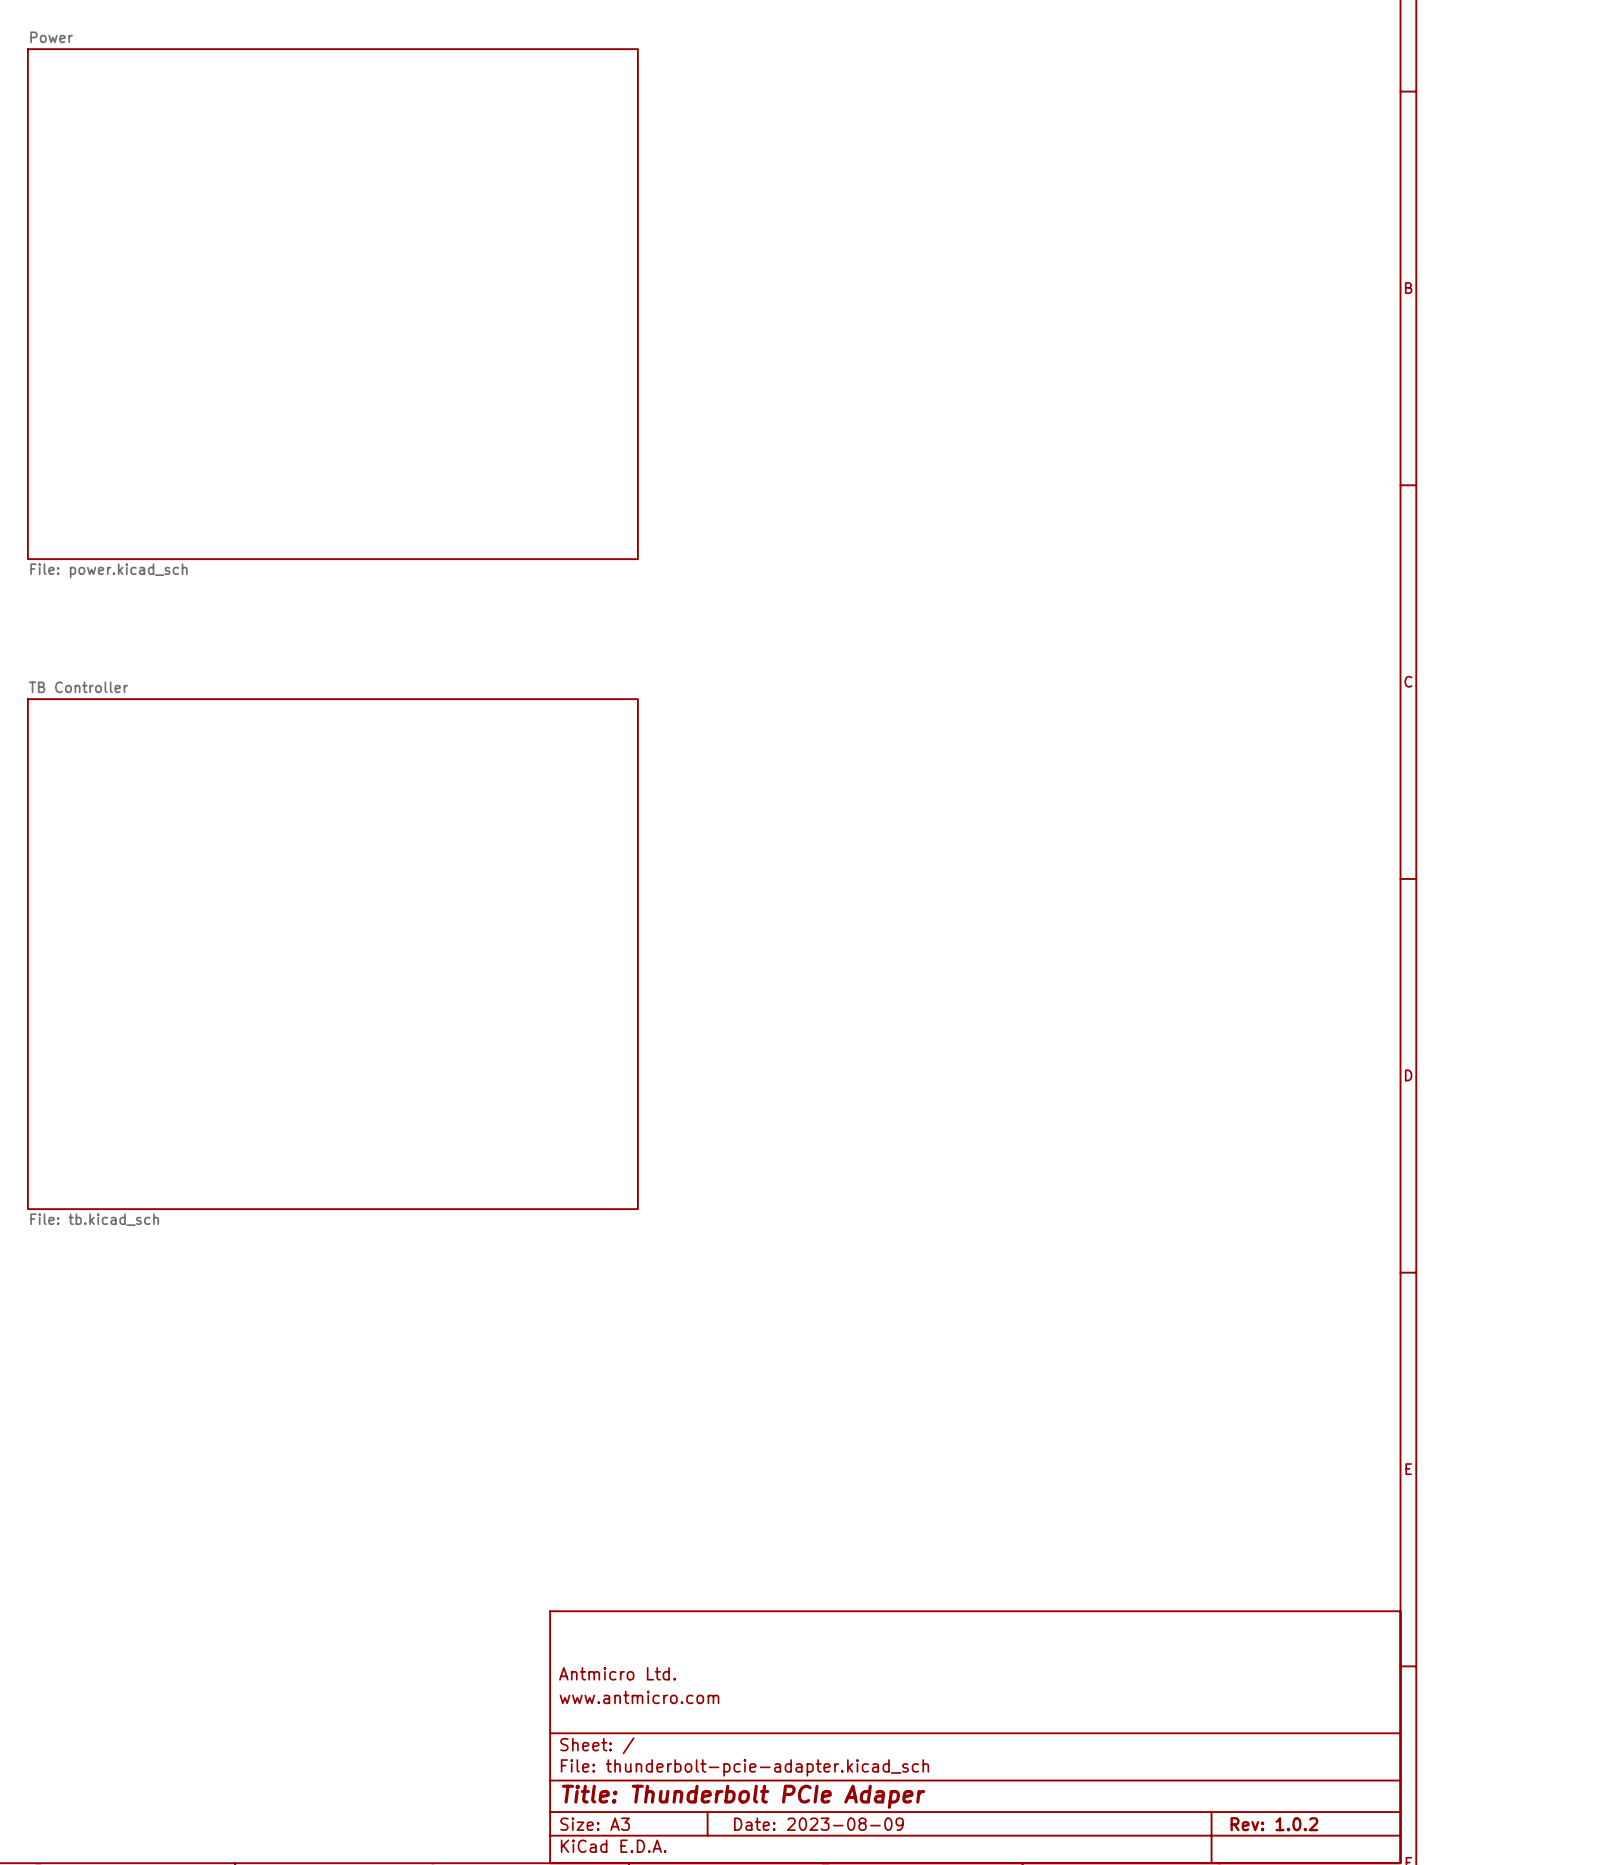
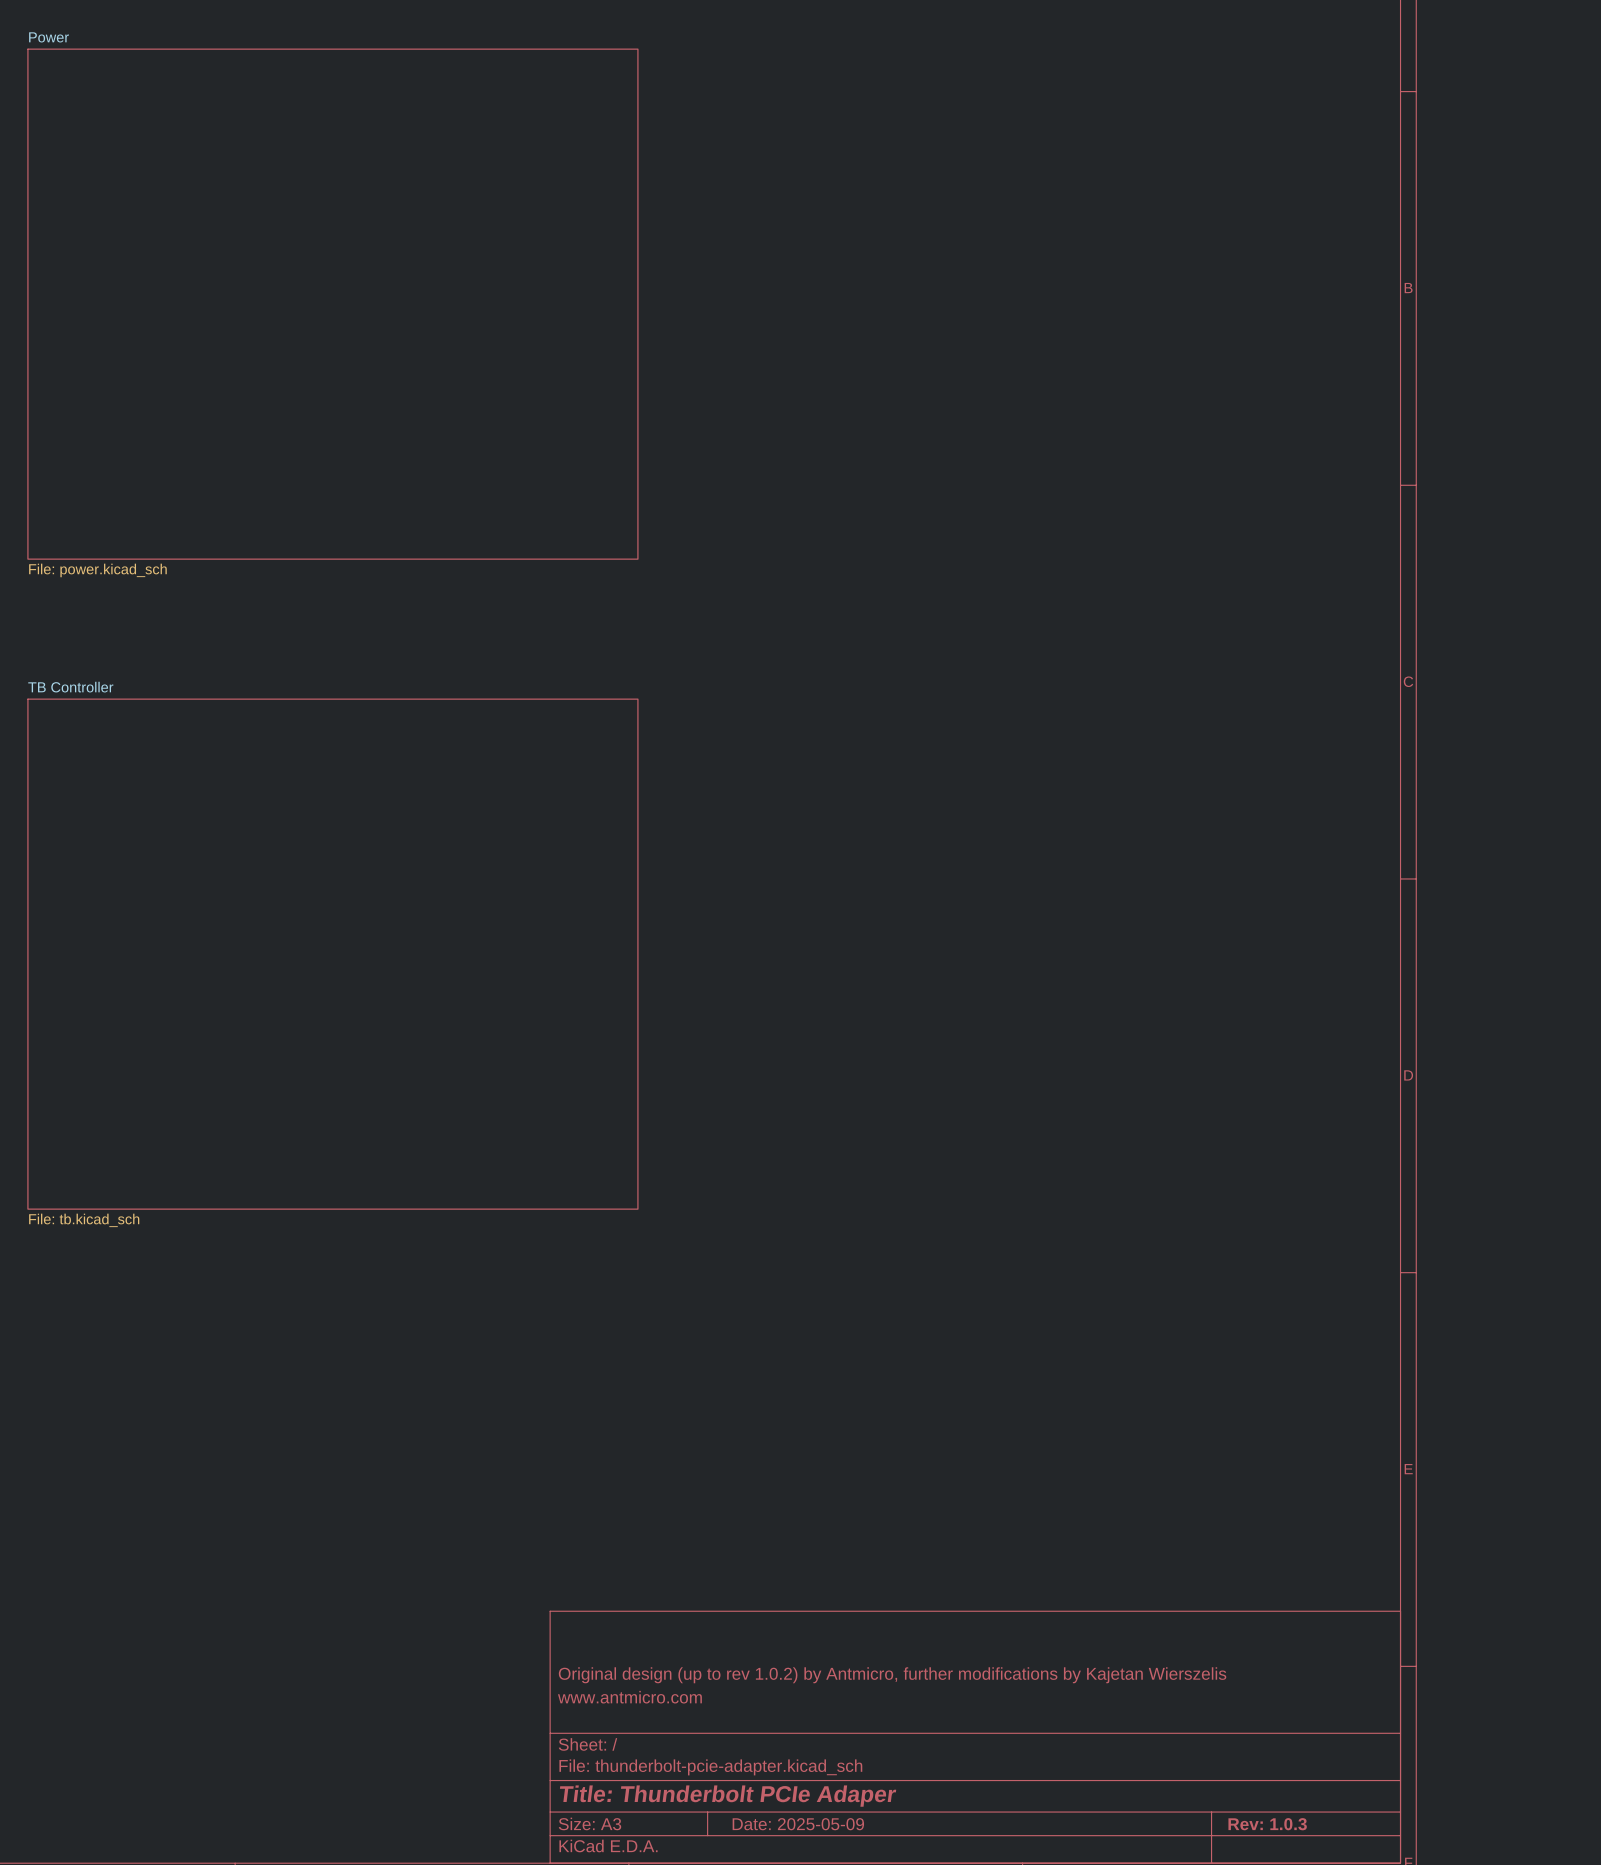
title block: Antmicro Ltd. (617, 1673) -> Original design (up to rev 1.0.2) by Antmicro, further modifications by Kajetan Wierszelis (892, 1675)
title block: Date: 2023-08-09 (818, 1824) -> Date: 2025-05-09 (798, 1824)
title block: Rev: 1.0.2 (1274, 1824) -> Rev: 1.0.3 (1267, 1824)

